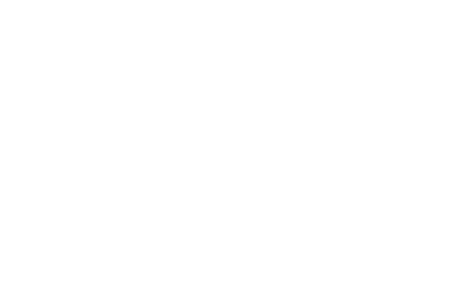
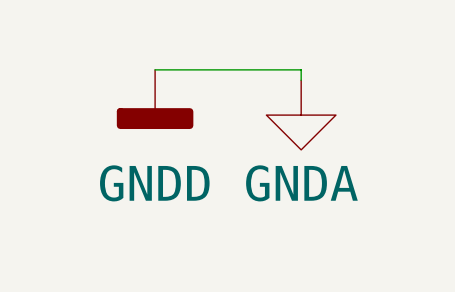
wire: none -> (155, 69) (301, 69) (301, 80)
power symbol: none -> GNDD (155, 99)
power symbol: none -> GNDA (301, 115)

